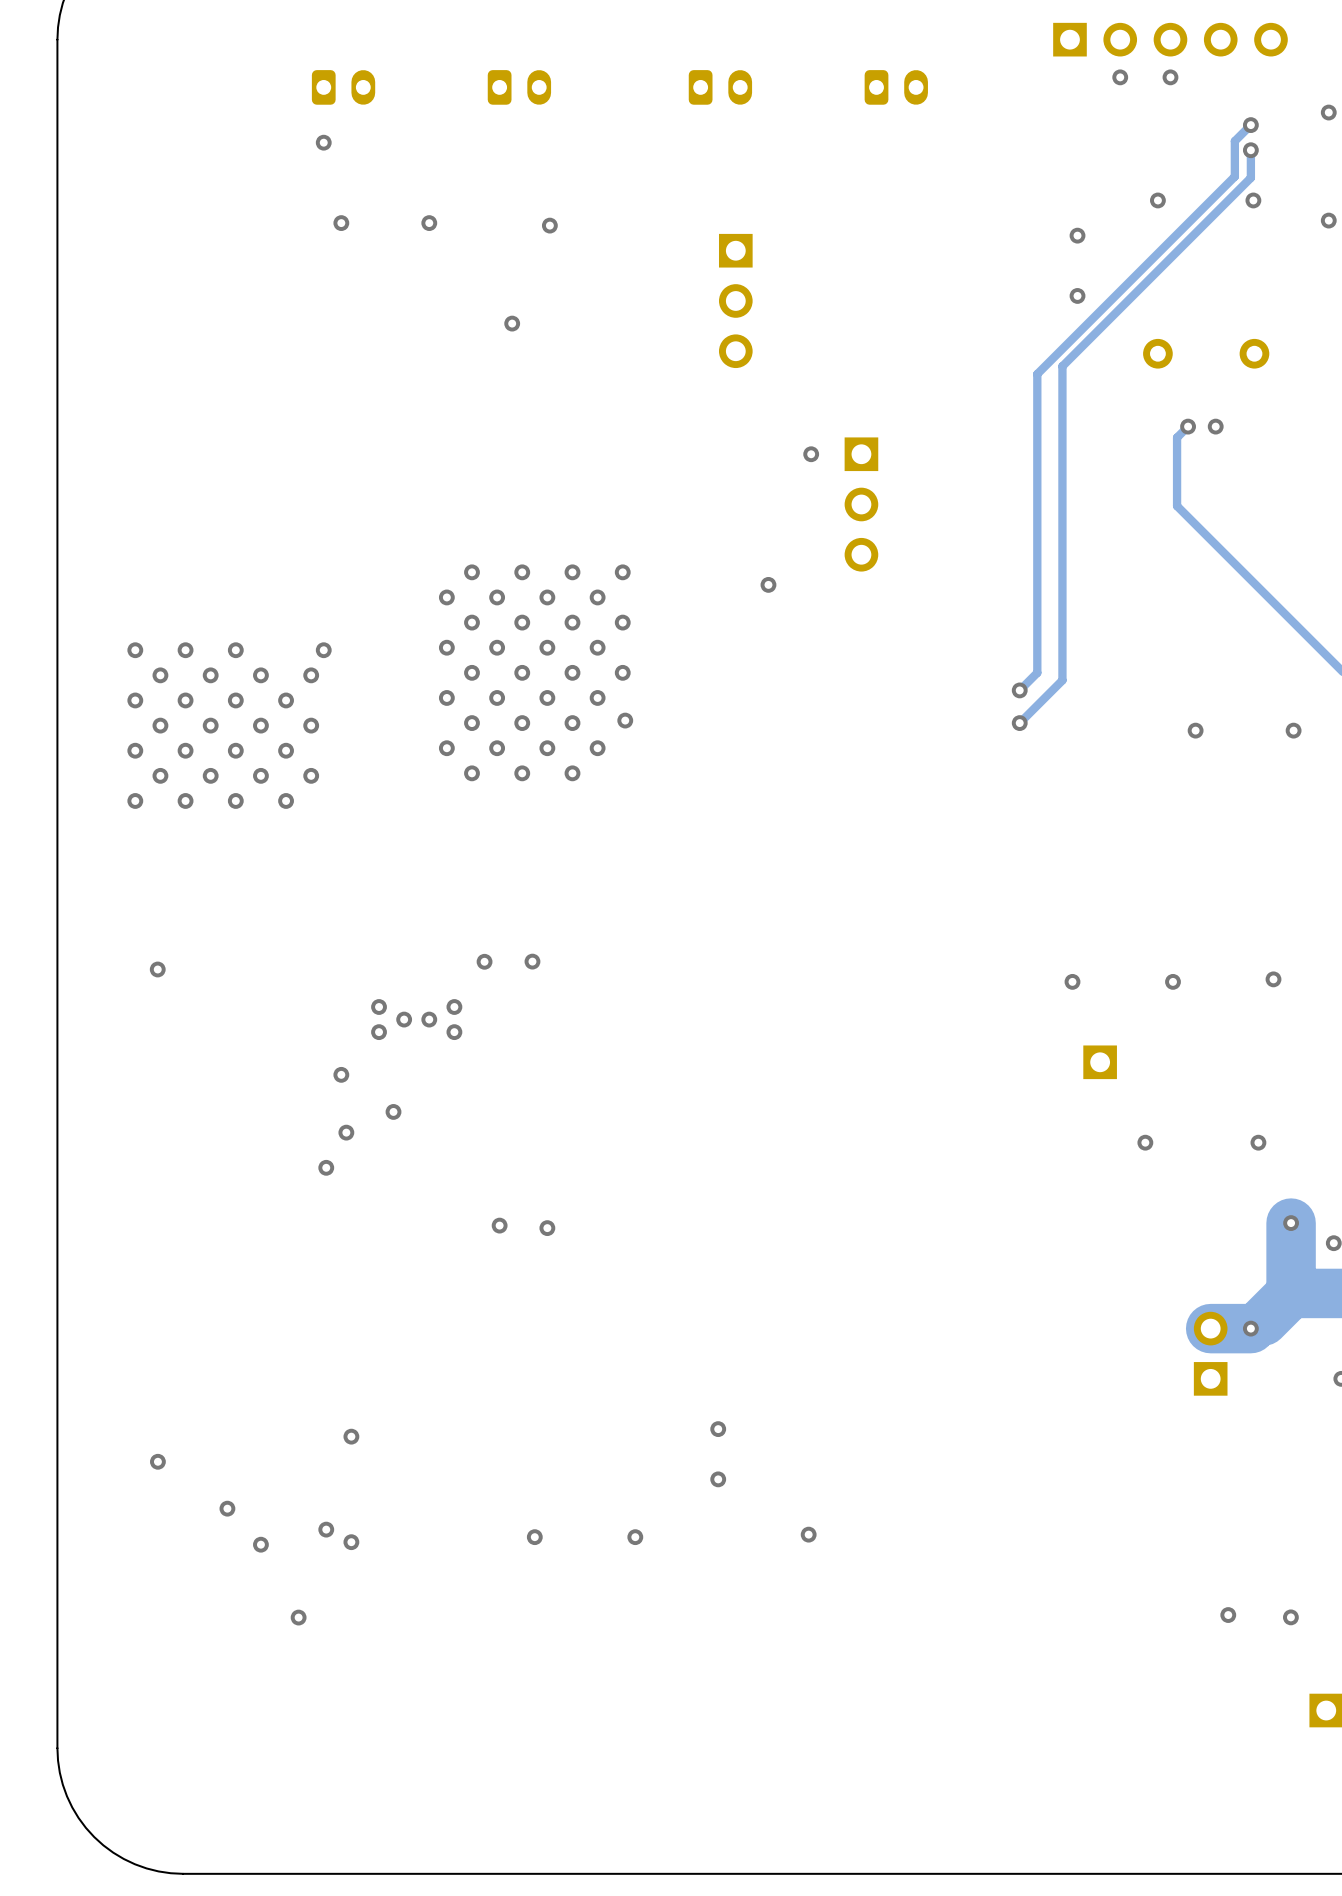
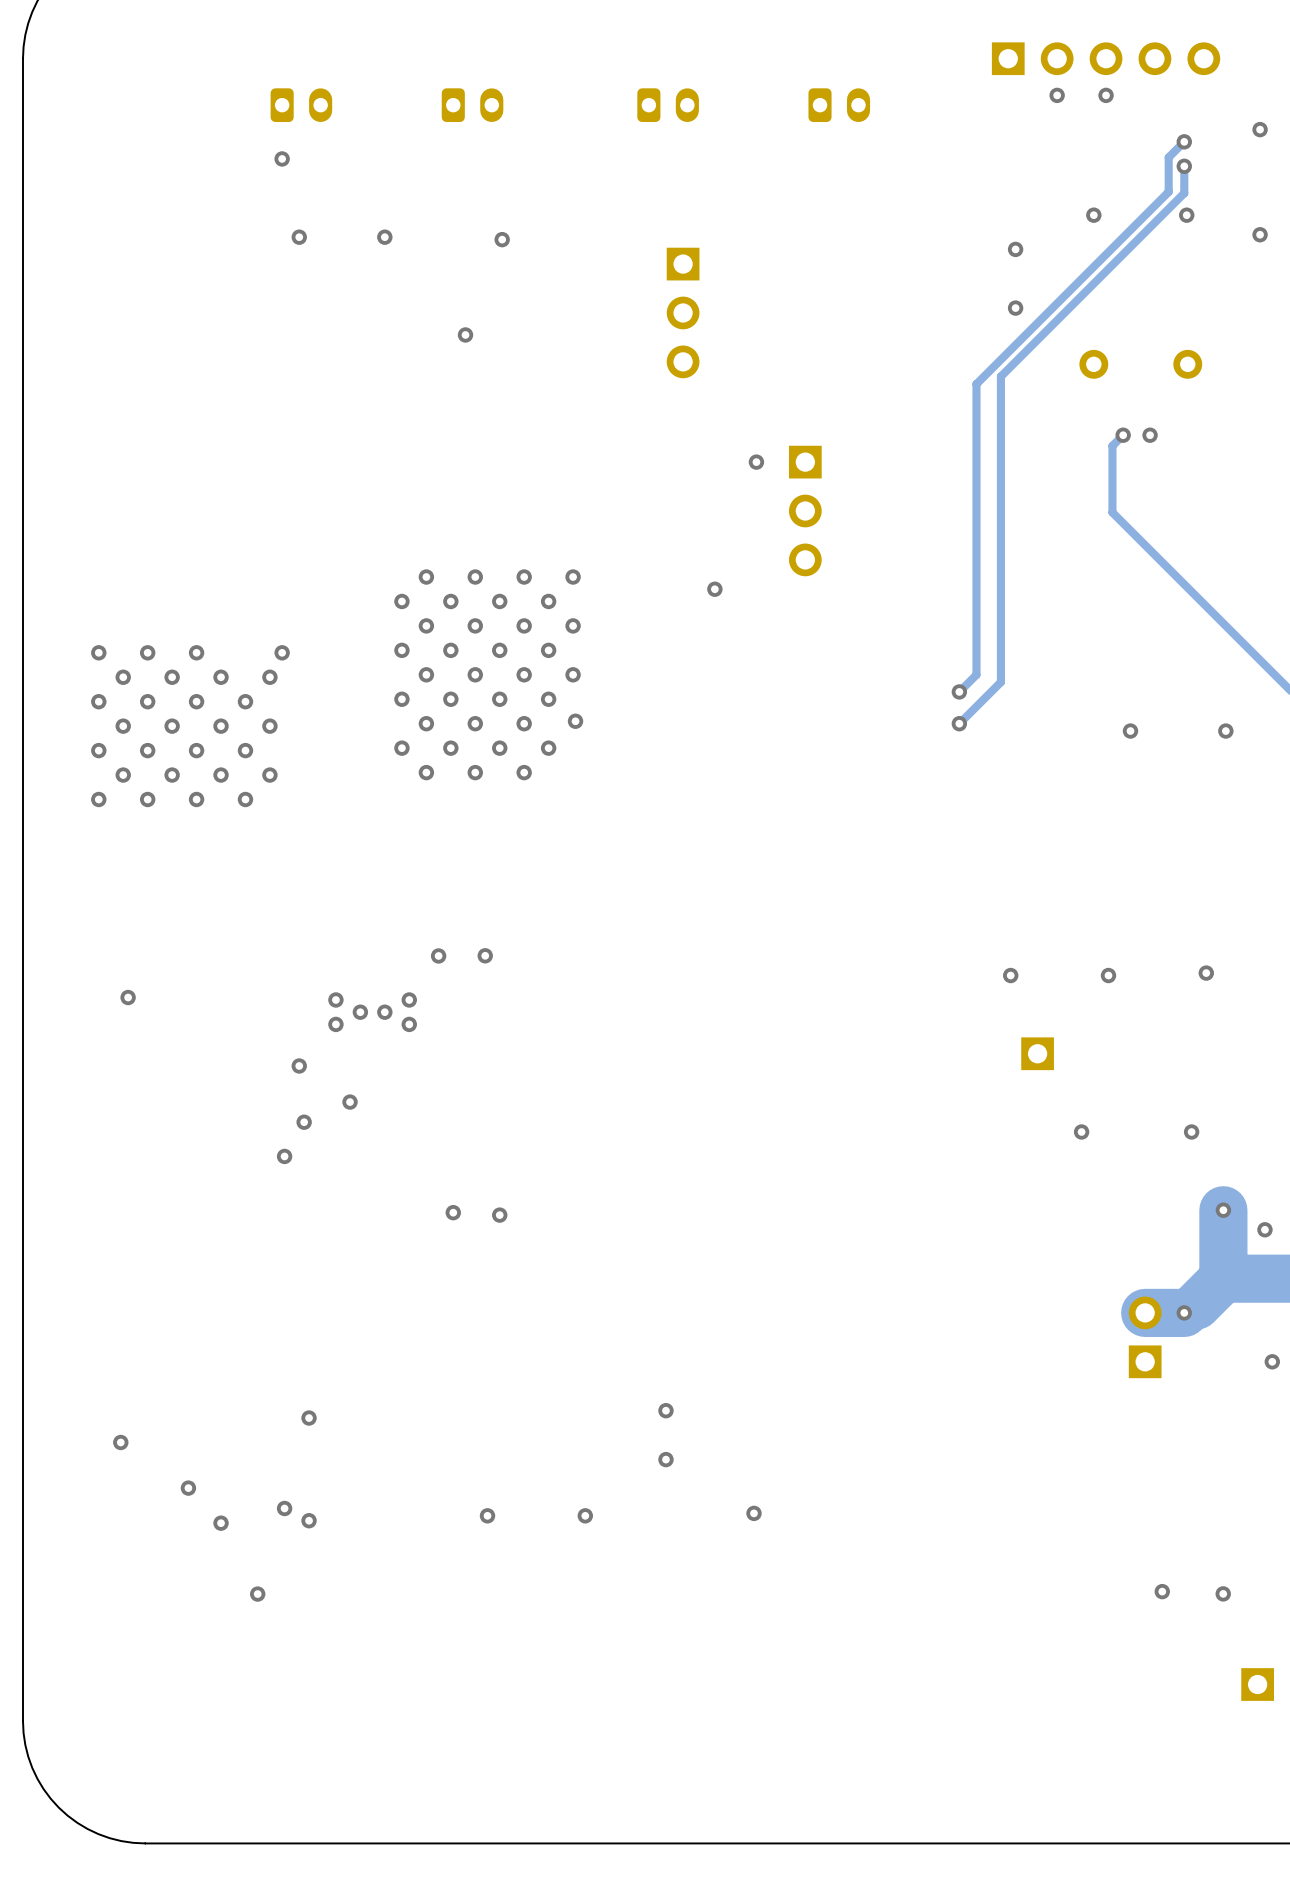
via position: (157, 969) -> (128, 997)

